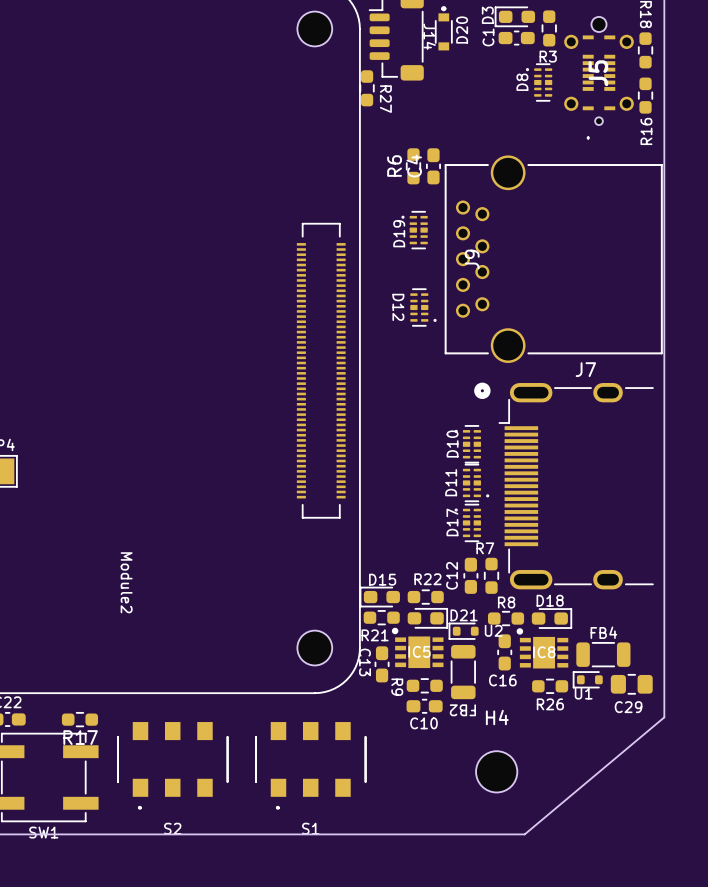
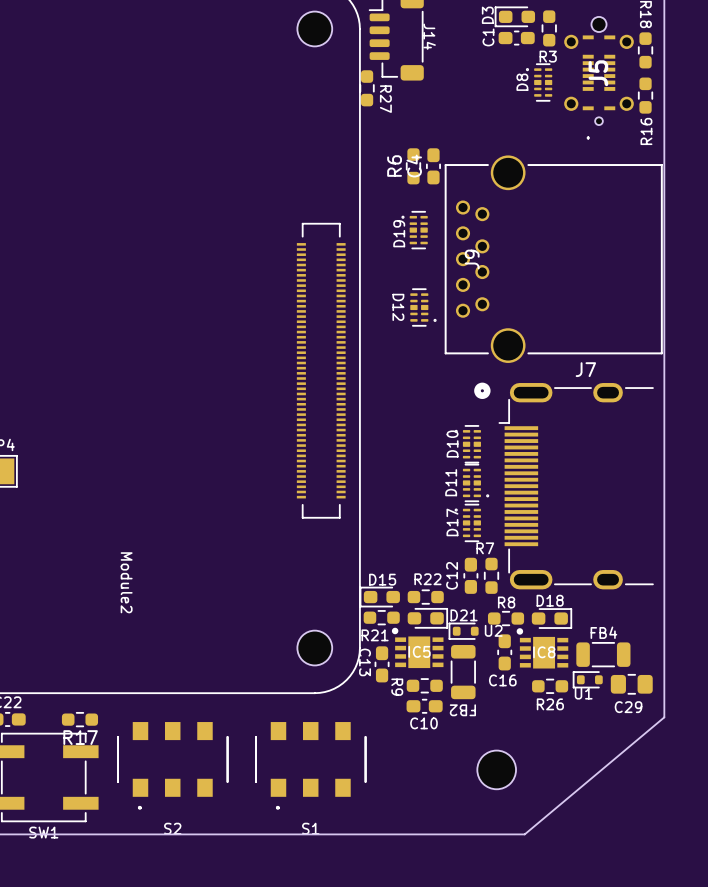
D20: (443, 28) -> none
part: none -> (496, 769)
H4: (496, 771) -> none

